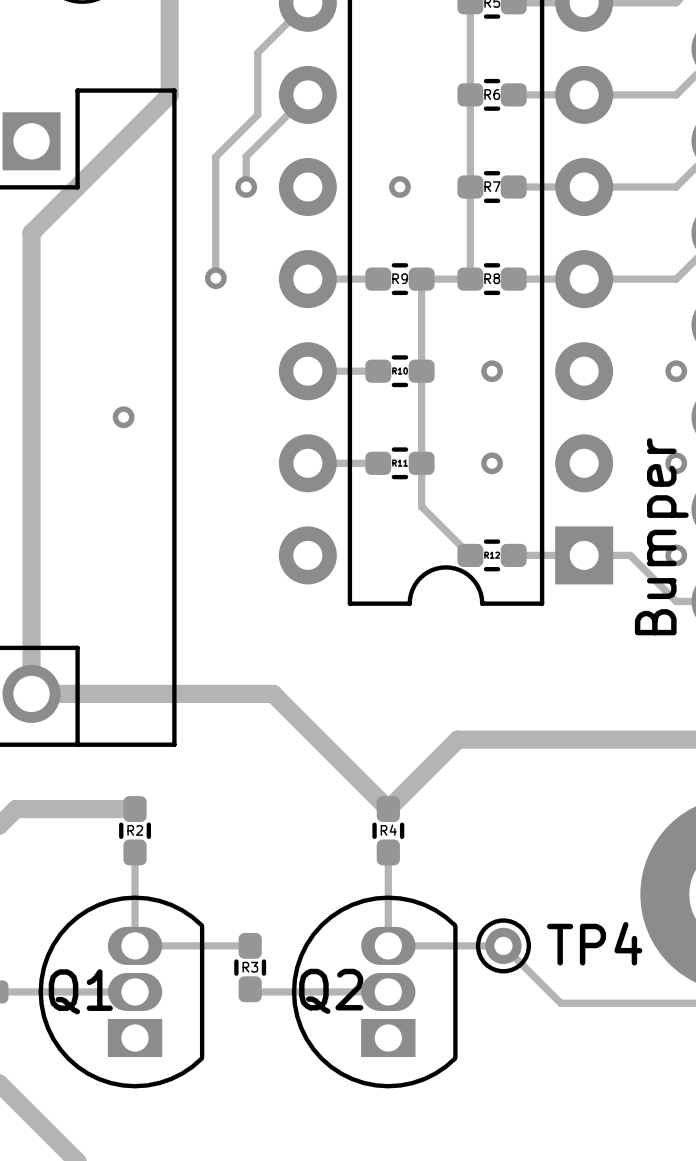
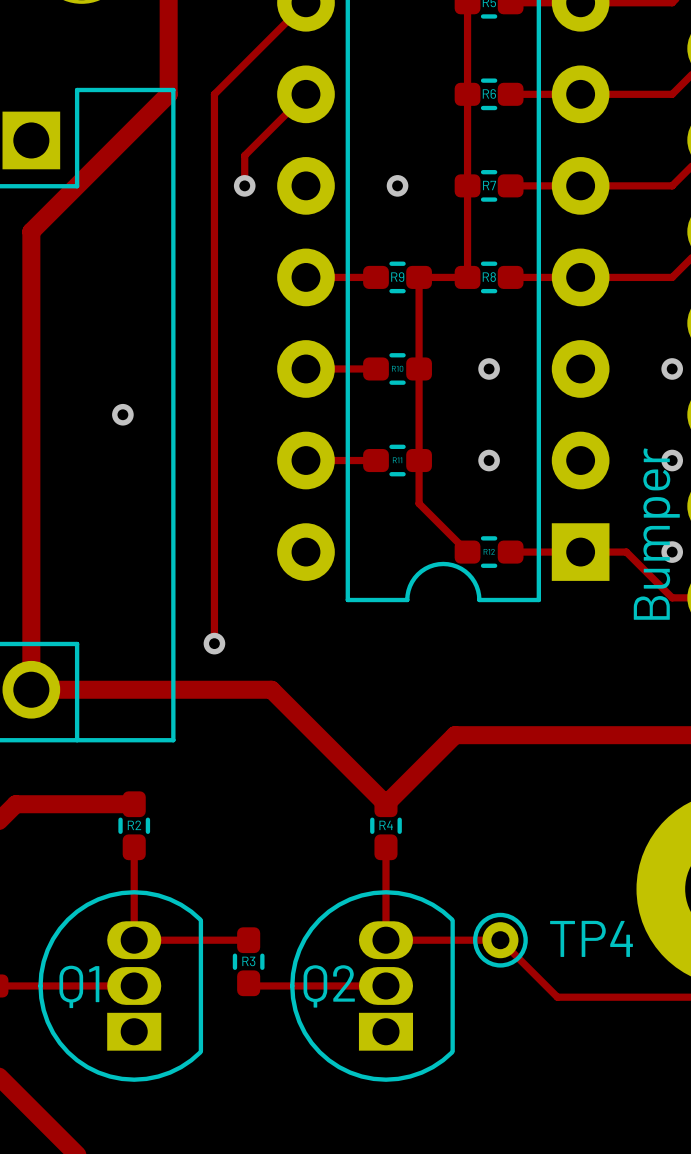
track: (257, 52) (257, 114) (215, 156) -> (256, 52) (214, 94) (214, 155)
track: none -> (214, 276) (214, 643)
via: (215, 278) -> none
via: none -> (214, 643)

